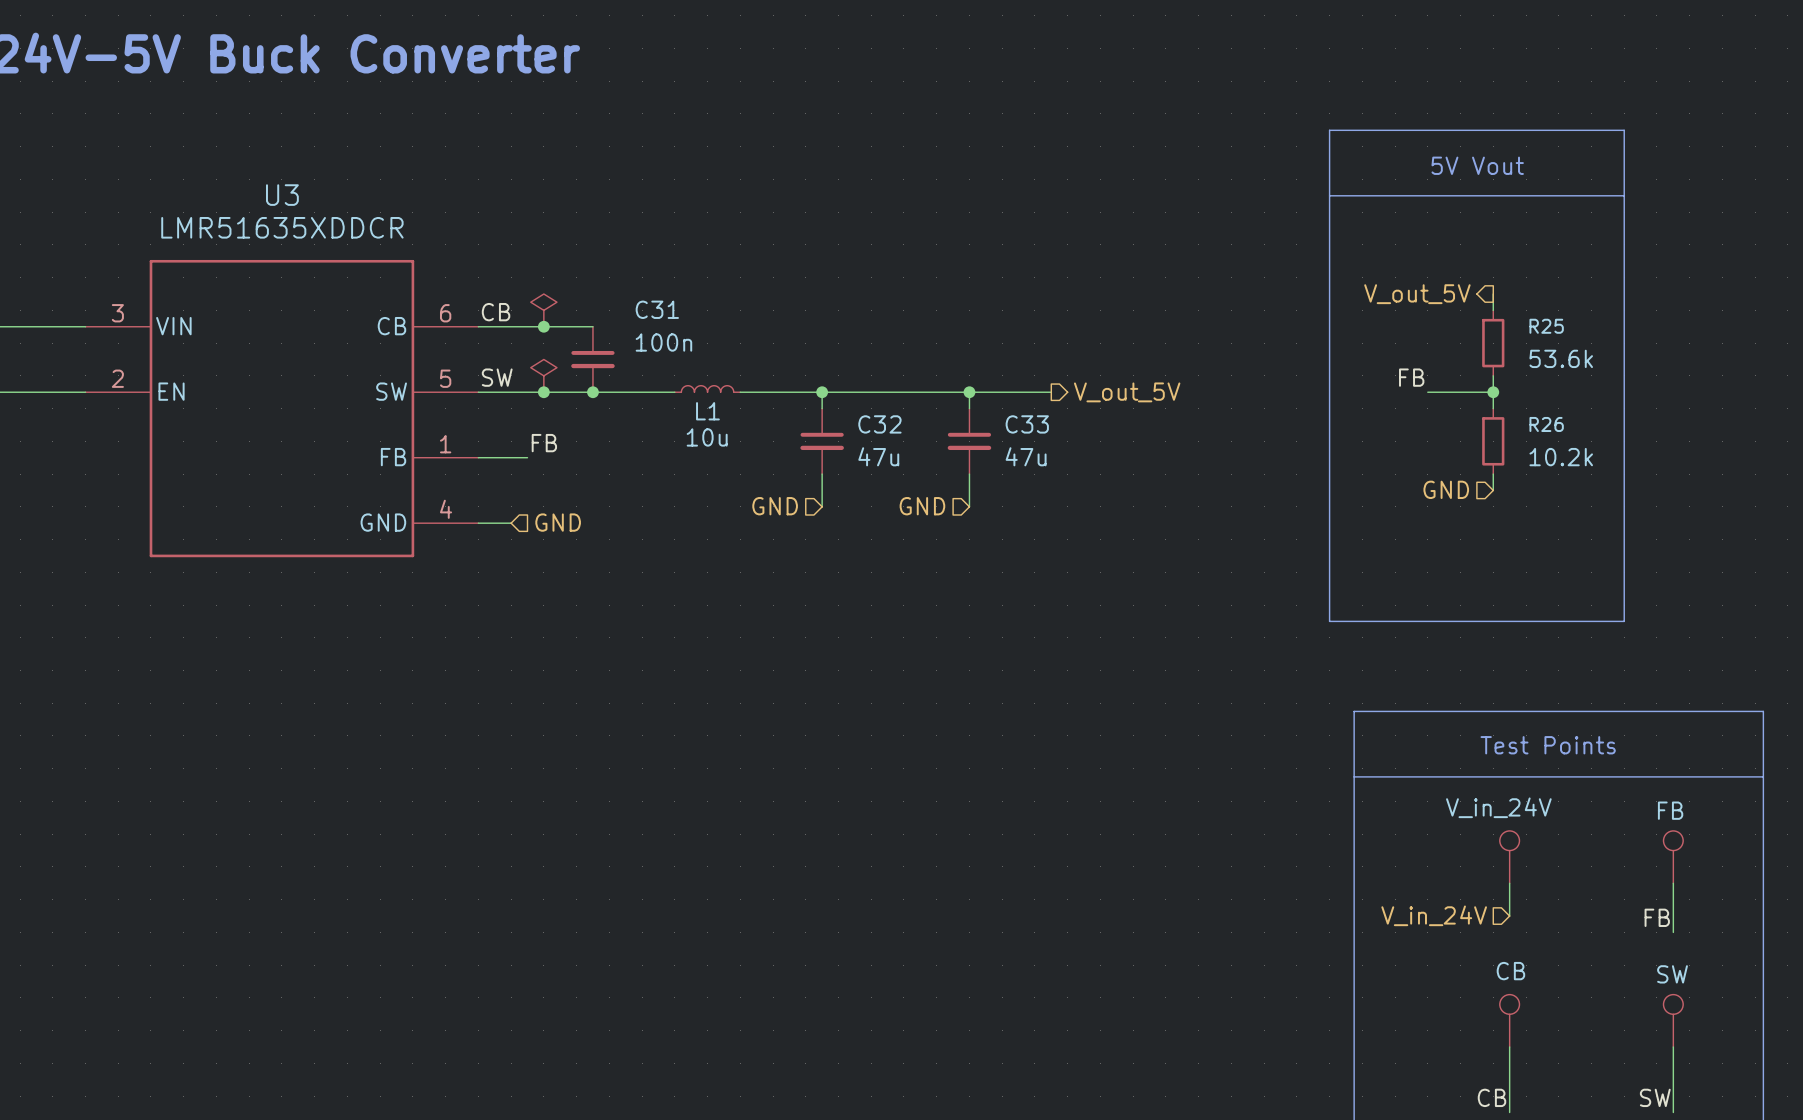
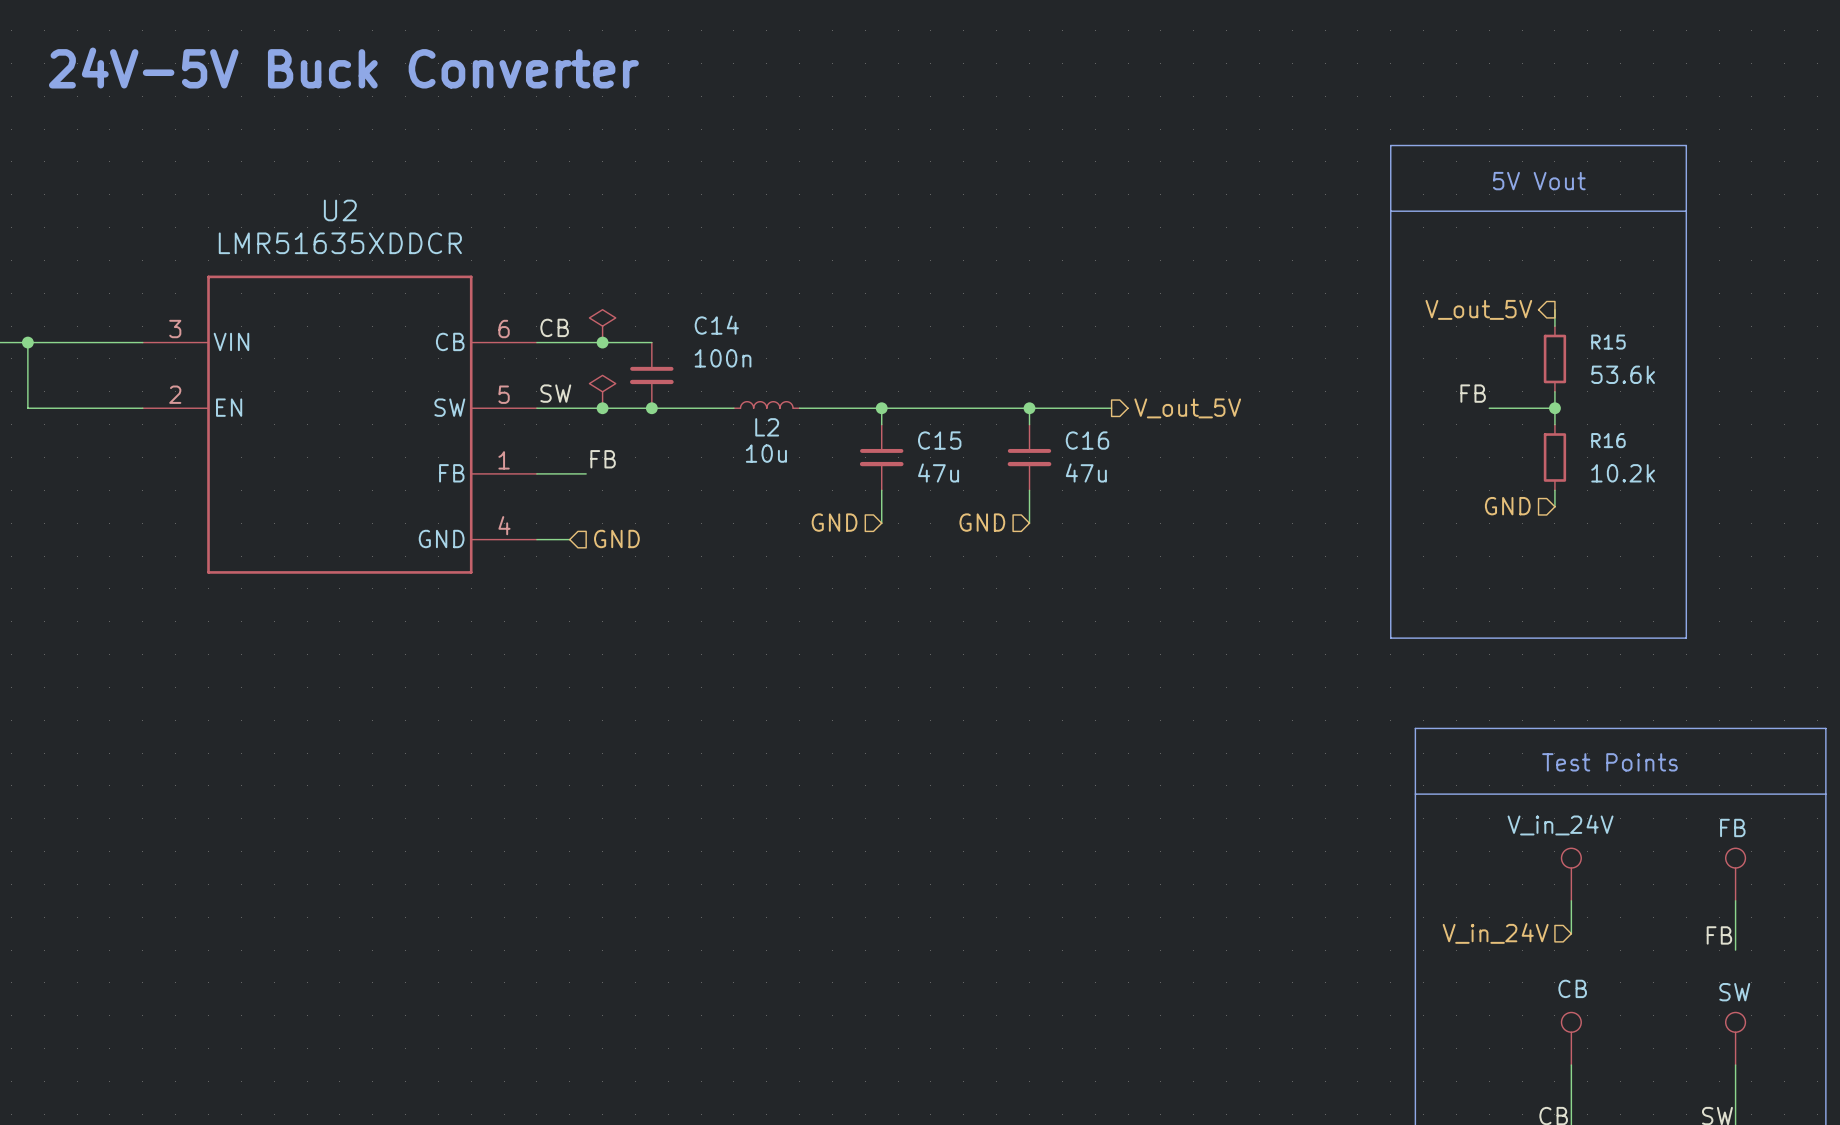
U3 name: U3 (282, 195) -> U2 (340, 210)
C31 name: C31 (657, 309) -> C14 (716, 325)
R25 name: R25 (1546, 326) -> R15 (1608, 342)
L1 name: L1 (707, 411) -> L2 (767, 427)
C32 name: C32 (879, 424) -> C15 (939, 440)
C33 name: C33 (1027, 424) -> C16 (1087, 440)
R26 name: R26 (1546, 424) -> R16 (1608, 440)

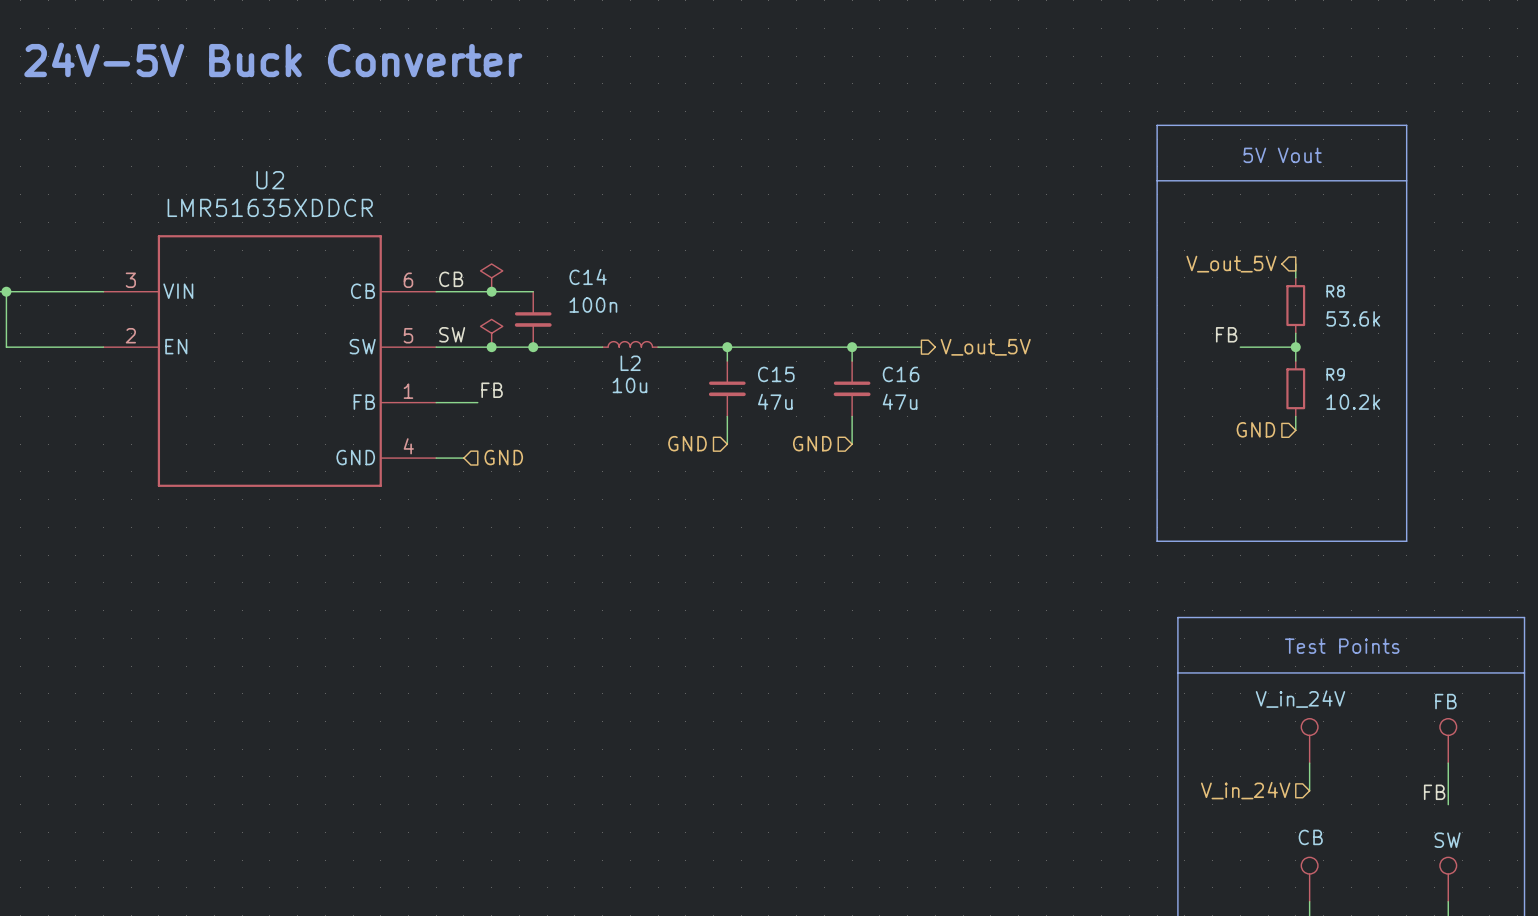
R15 name: R15 (1608, 342) -> R8 (1335, 291)
R16 name: R16 (1608, 440) -> R9 (1335, 374)

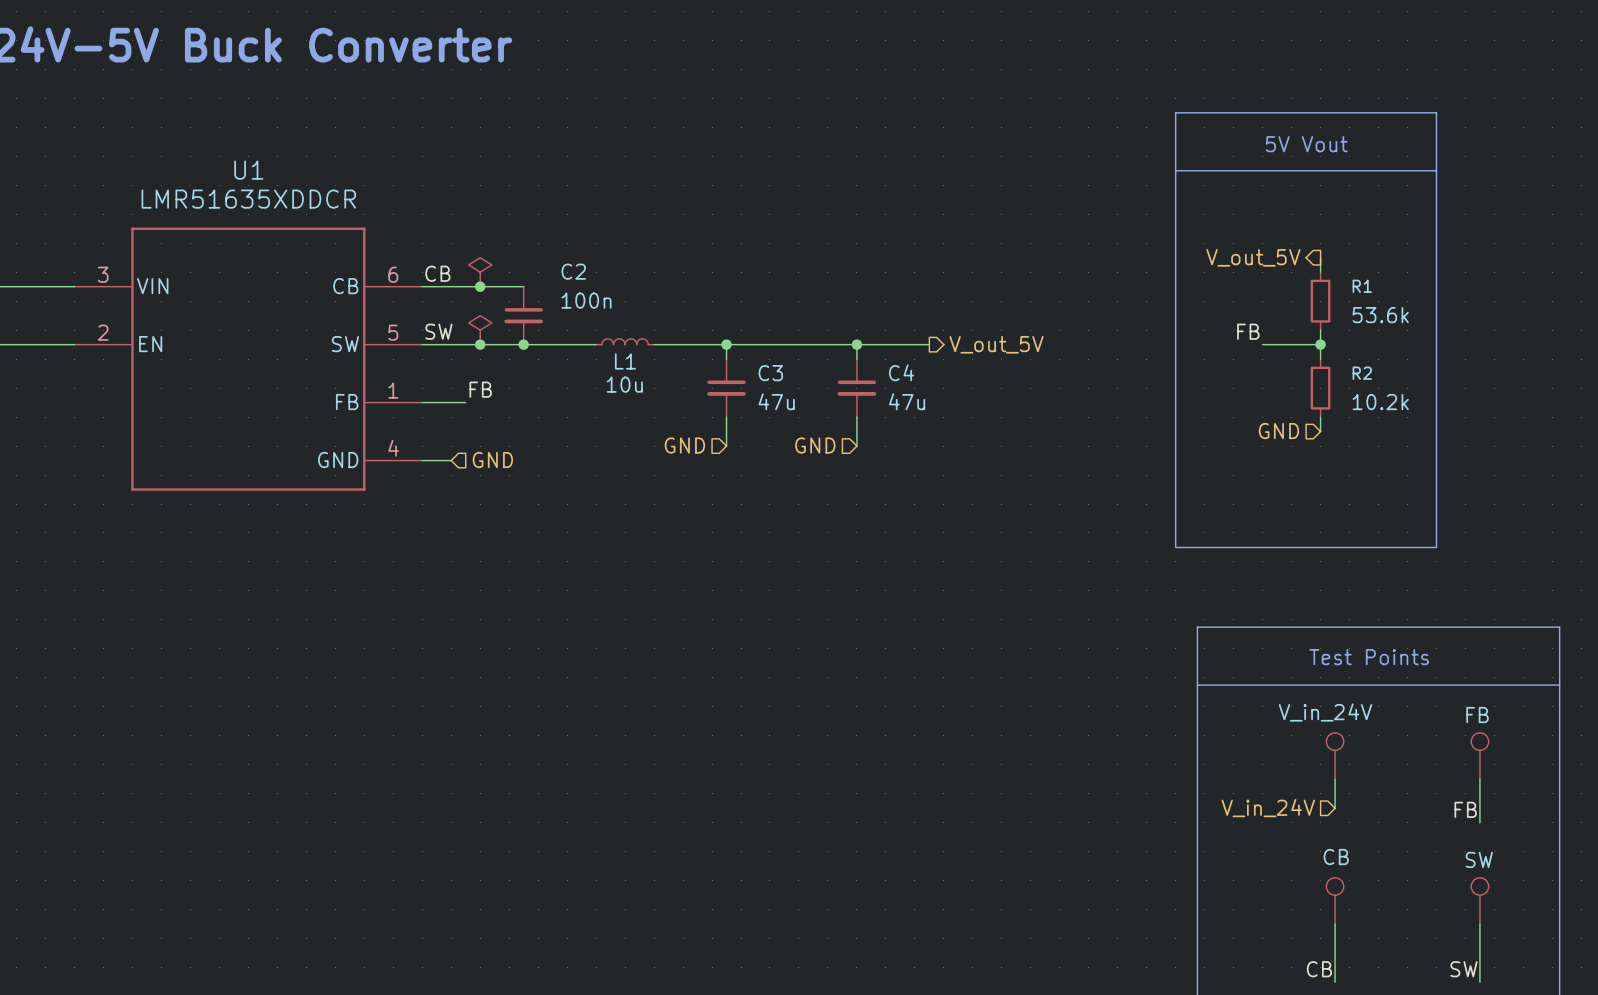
U2 name: U2 (270, 180) -> U1 (248, 170)
C14 name: C14 (588, 276) -> C2 (573, 271)
R8 name: R8 (1335, 291) -> R1 (1362, 286)
L2 name: L2 (630, 363) -> L1 (625, 361)
C15 name: C15 (776, 374) -> C3 (770, 373)
C16 name: C16 (901, 374) -> C4 (901, 372)
R9 name: R9 (1335, 374) -> R2 (1362, 373)

